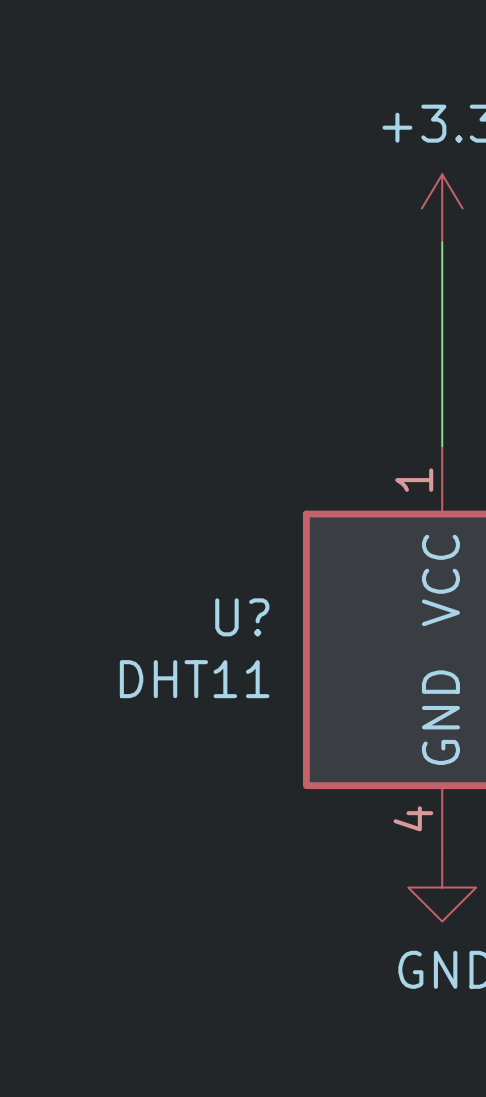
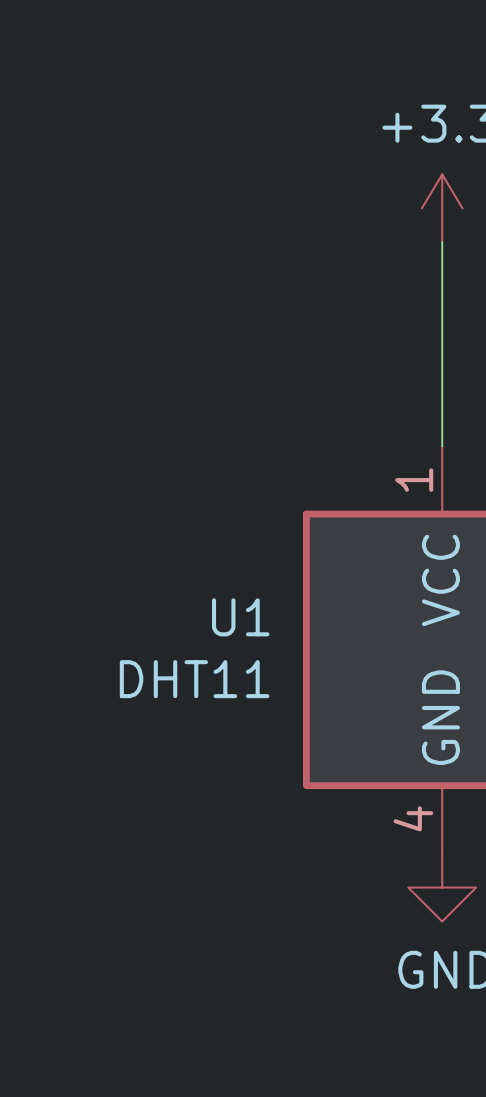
U? name: U? (242, 617) -> U1 (240, 617)

